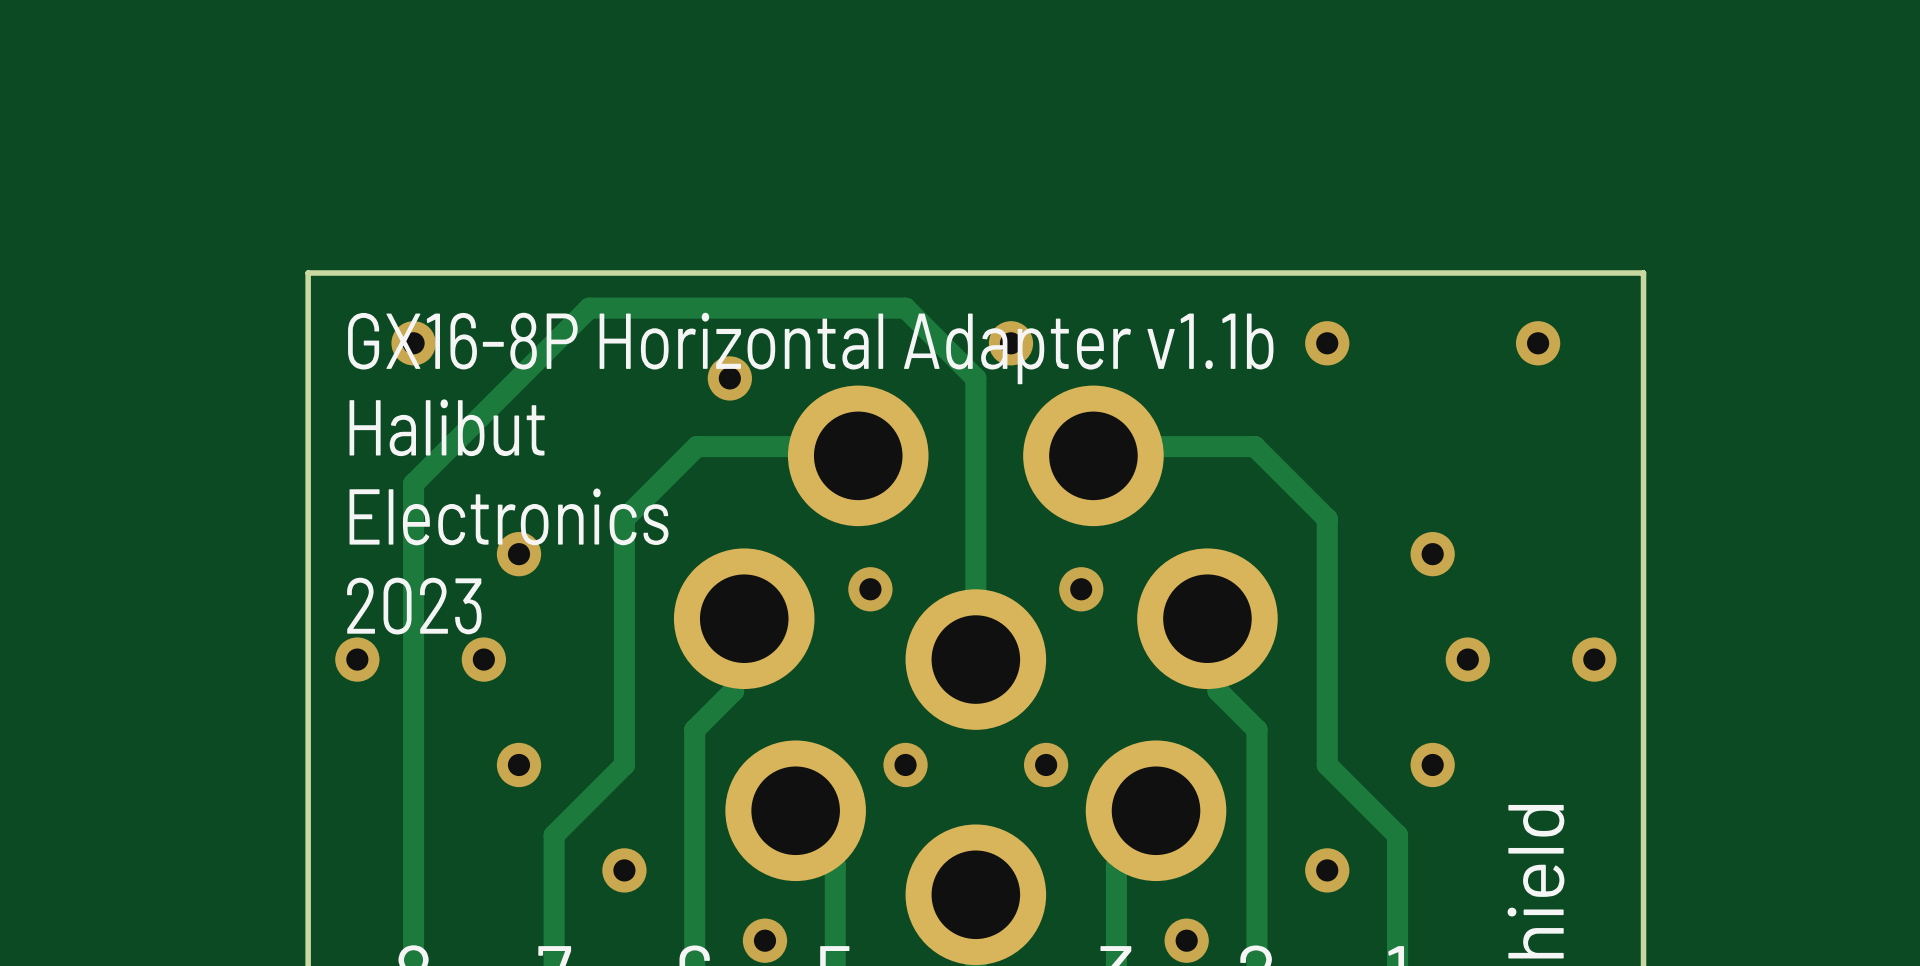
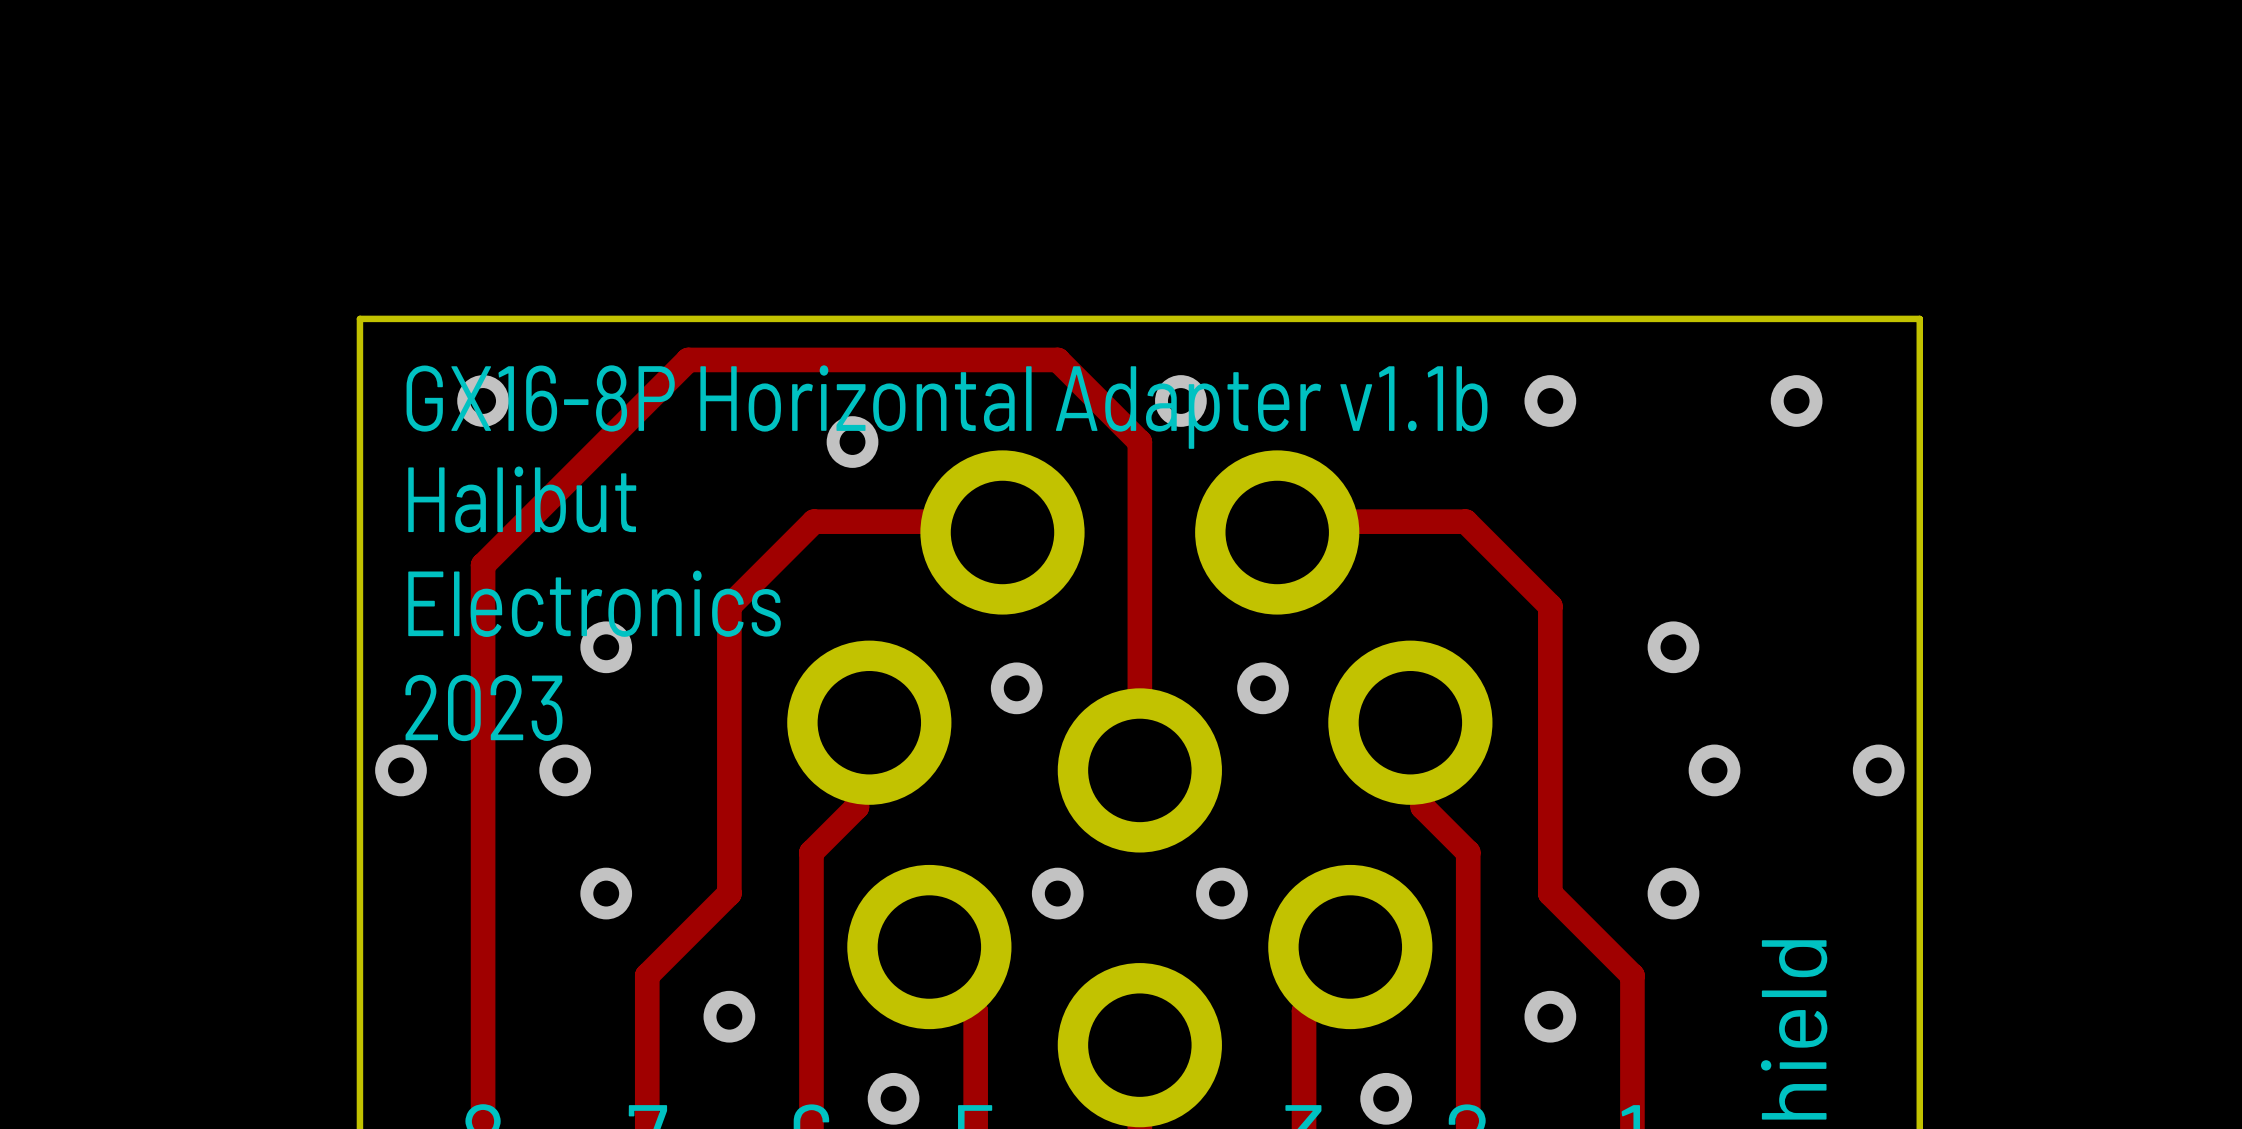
via position: (357, 659) -> (400, 770)
via position: (1594, 659) -> (1878, 770)

